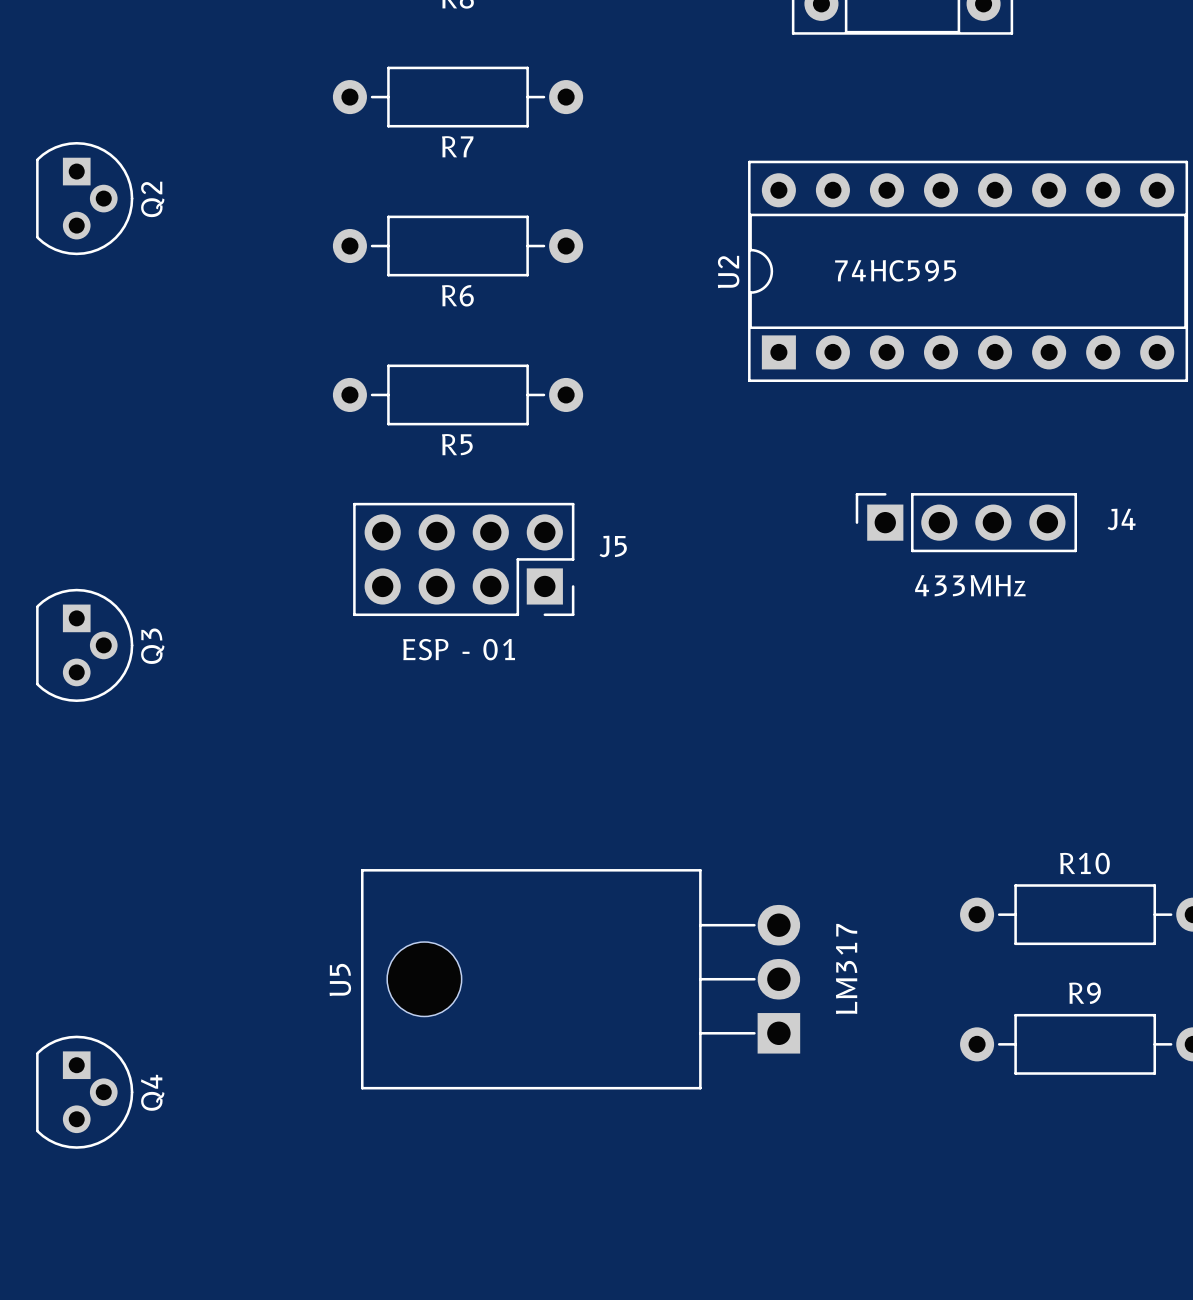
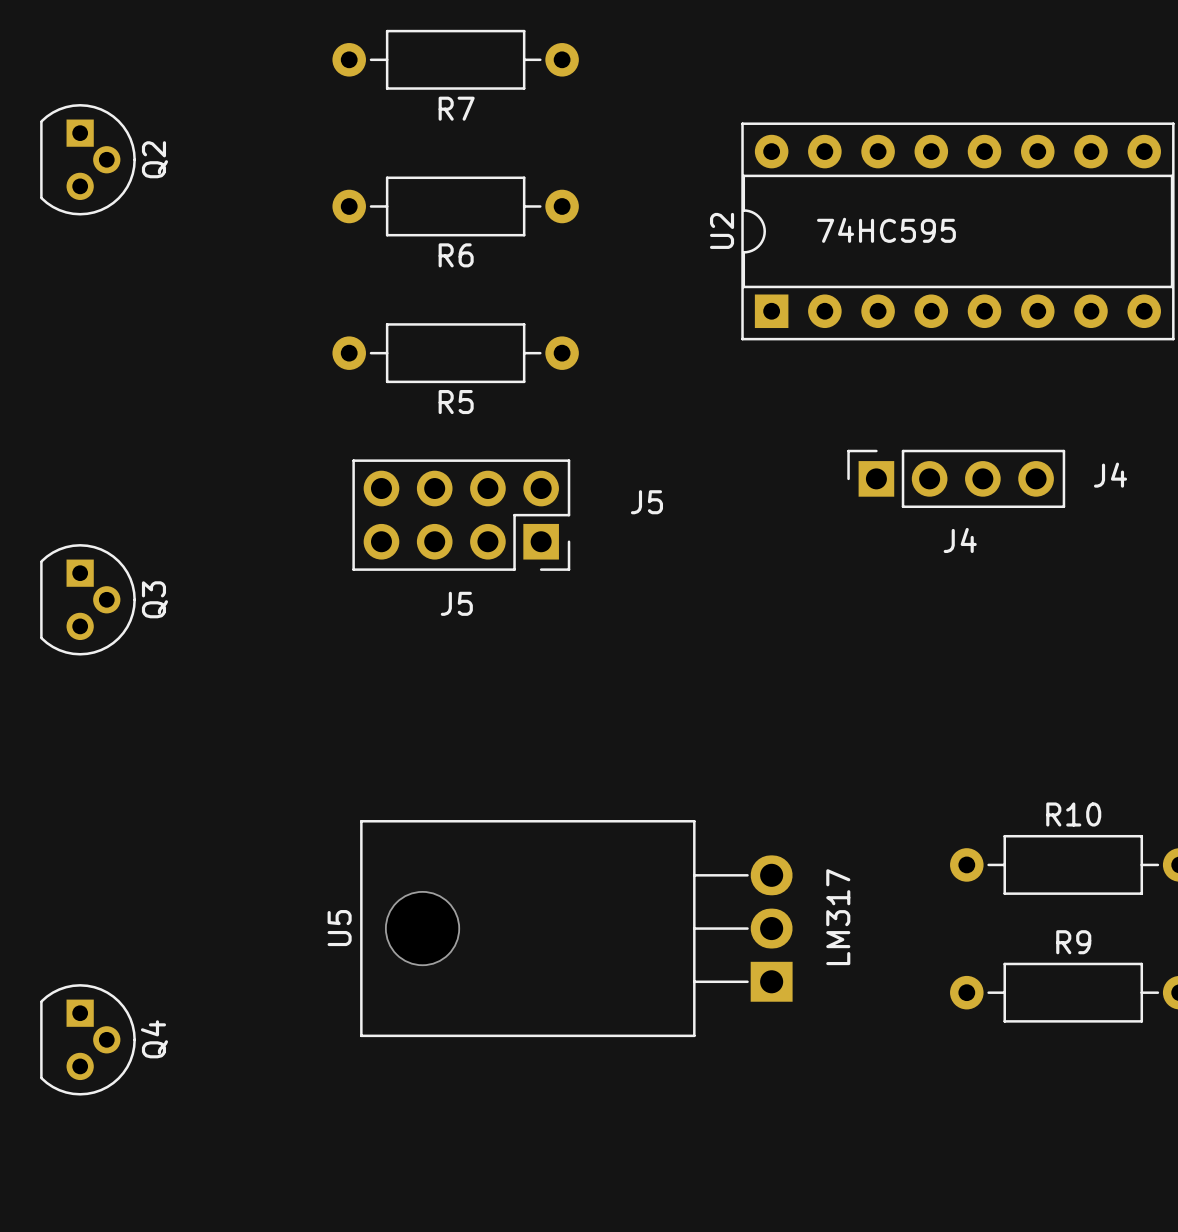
text position: J5 (613, 546) -> J5 (646, 502)
433MHz name: 433MHz (970, 585) -> J4 (960, 540)
ESP - 01 name: ESP - 01 (459, 649) -> J5 (456, 603)

